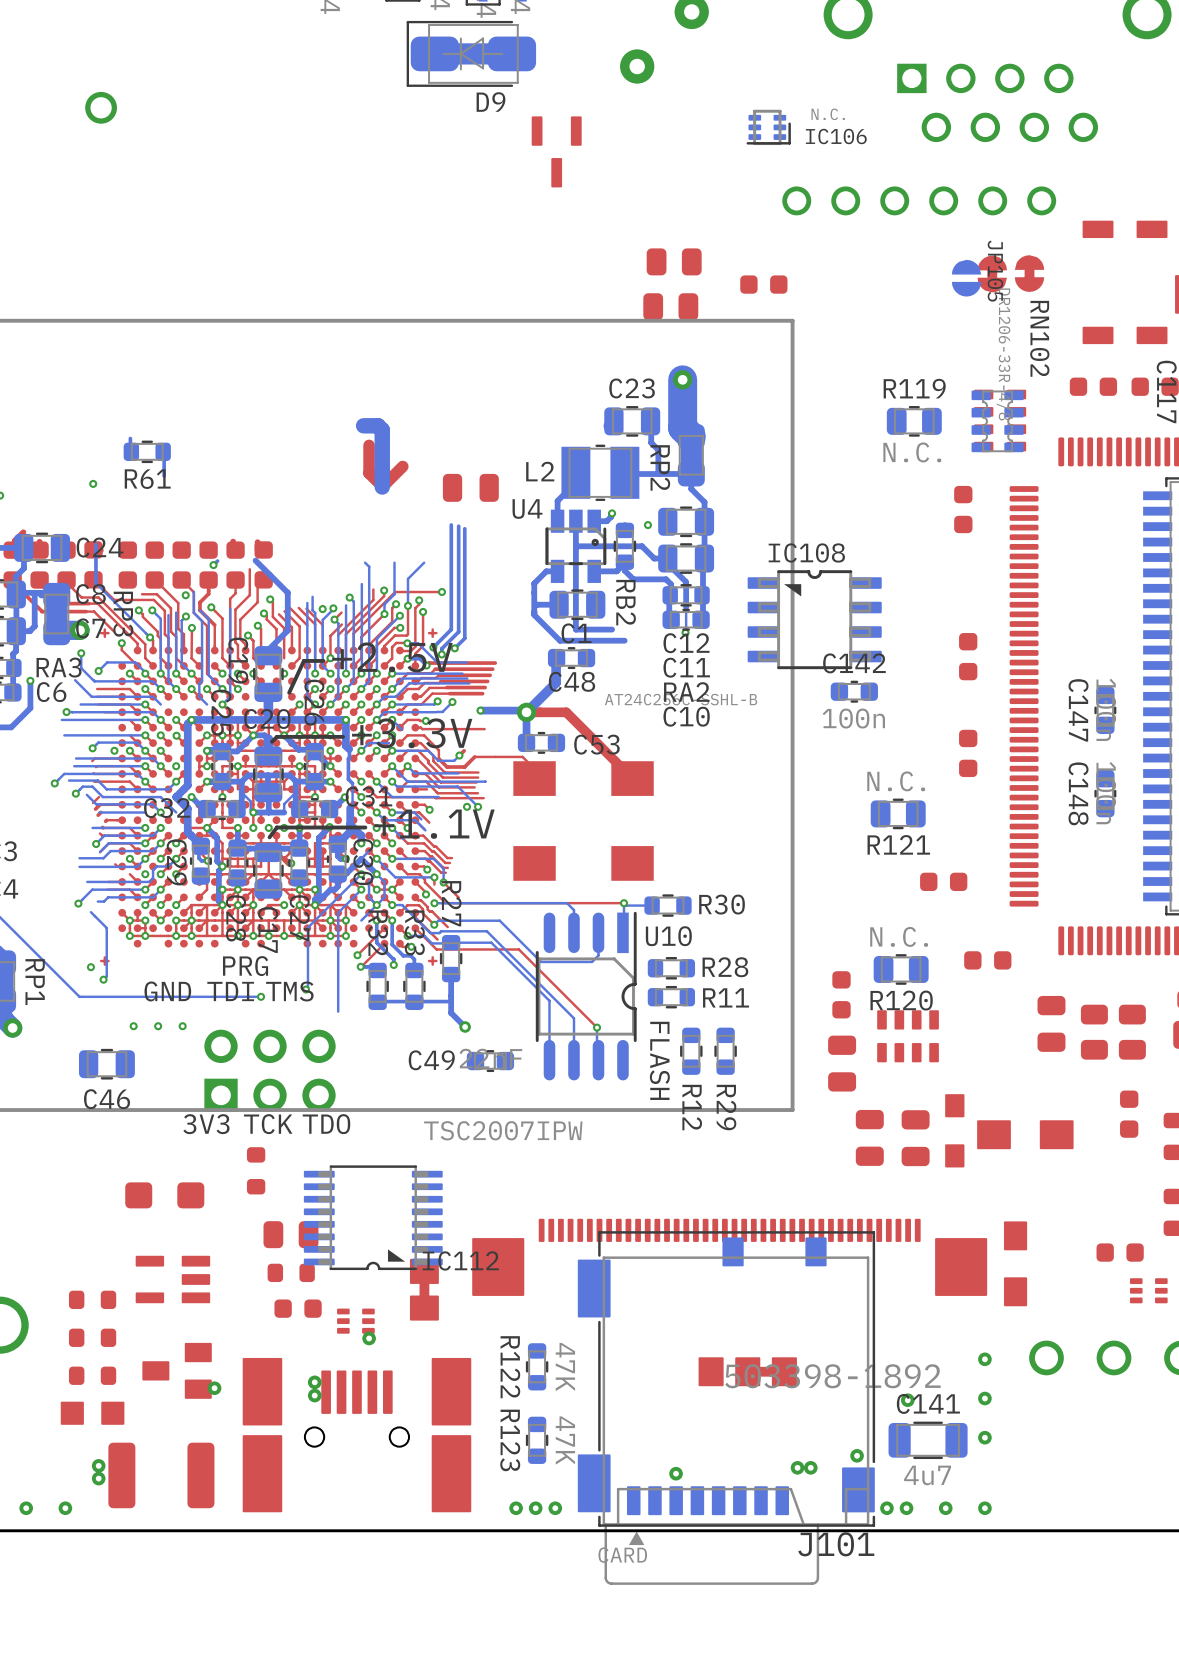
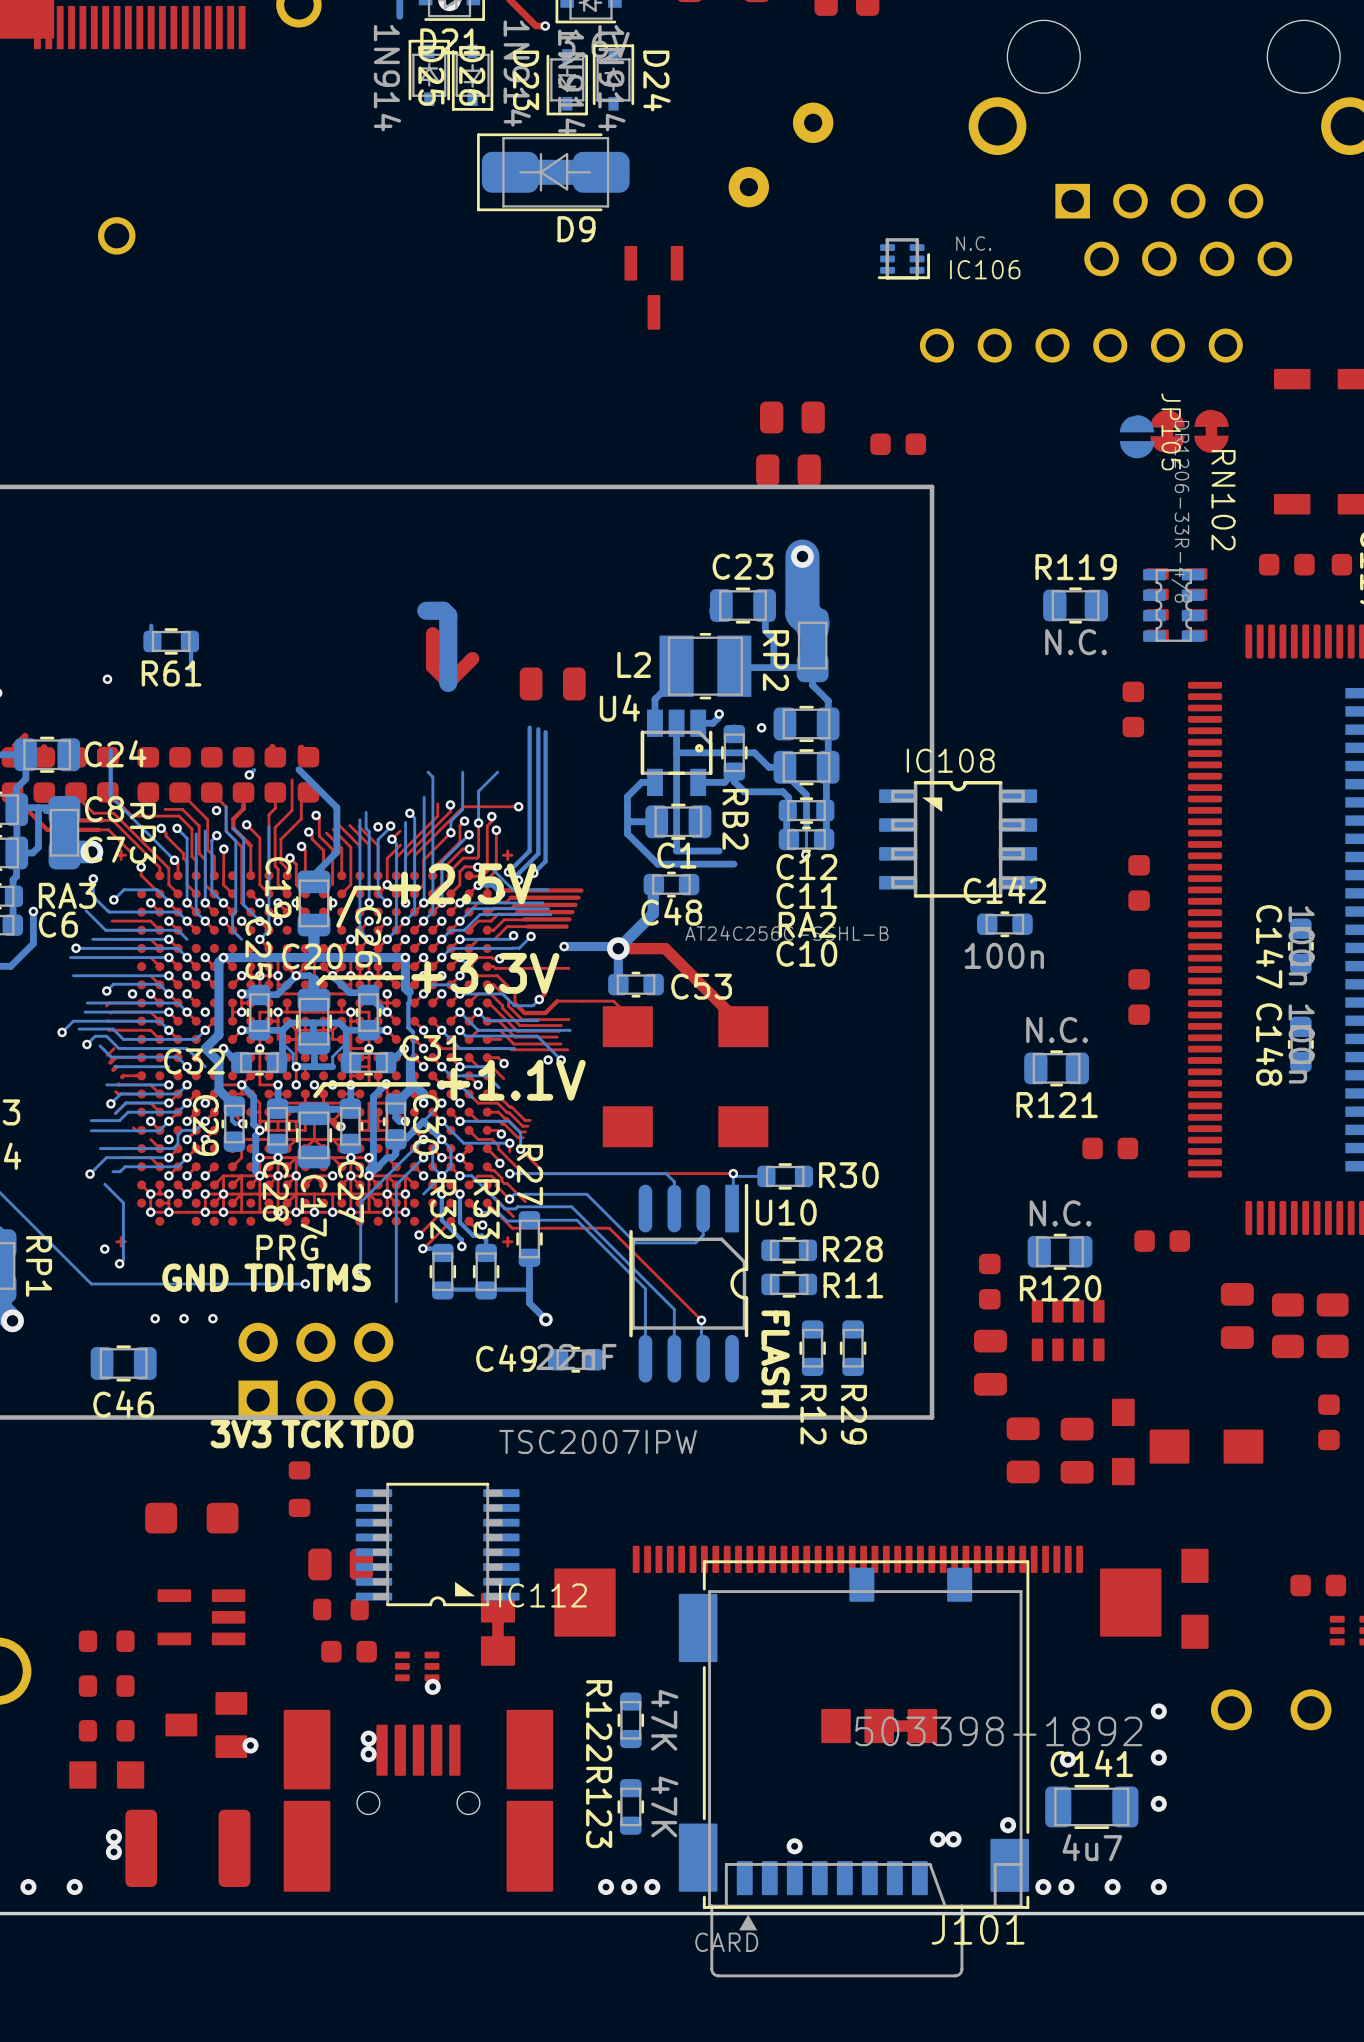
top track: none -> (569, 1019) (561, 1019)

